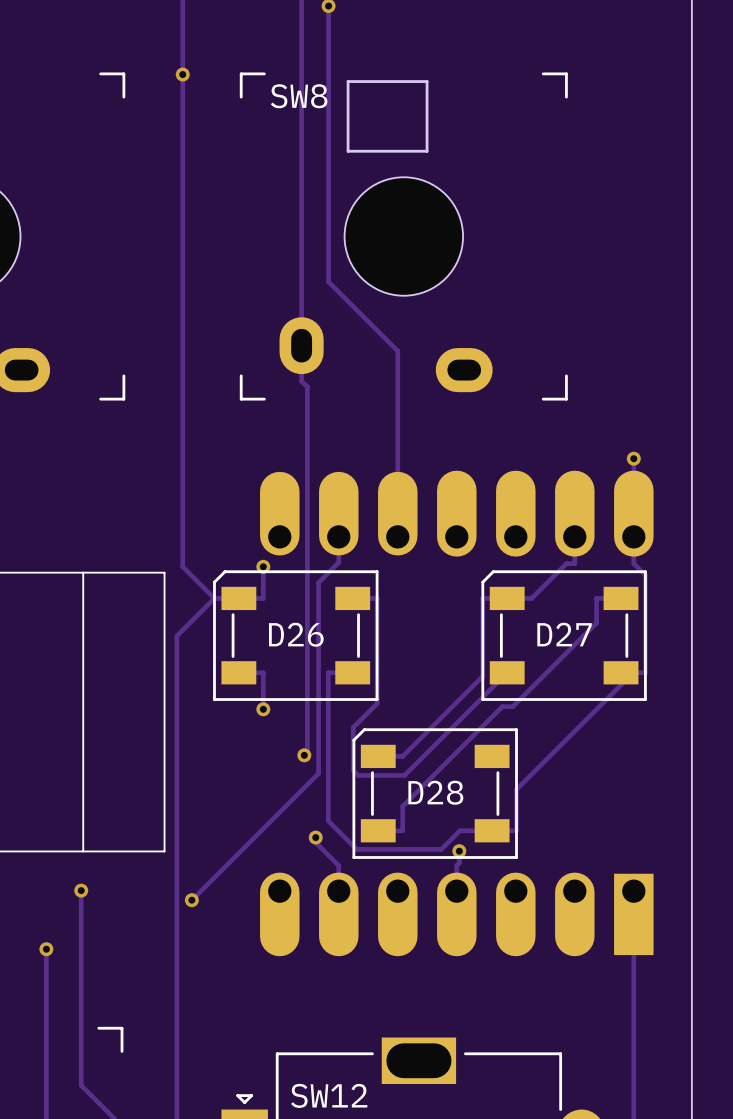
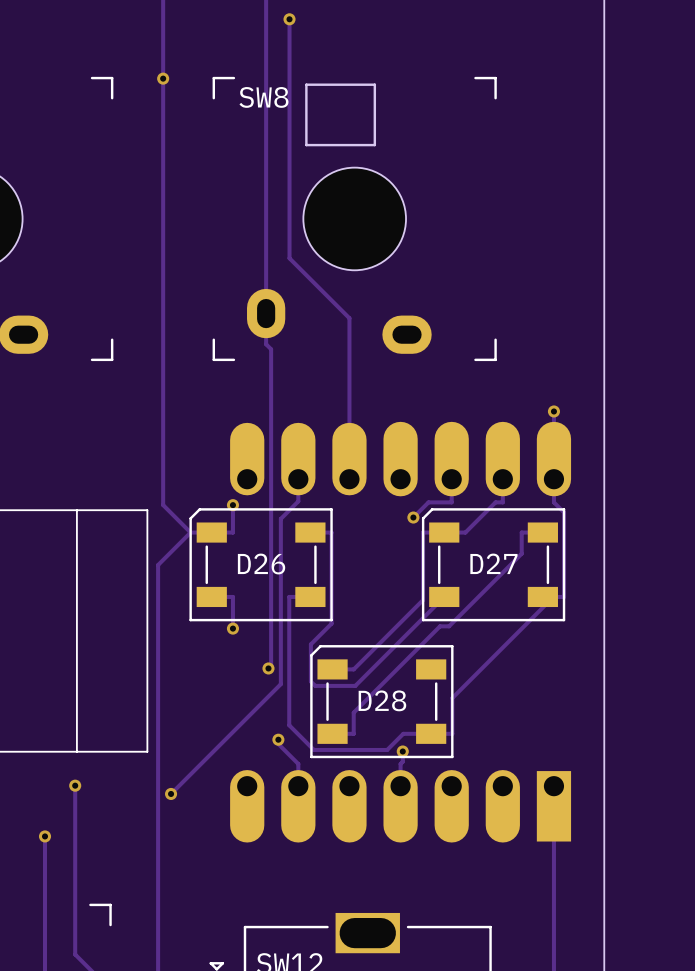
track: none -> (451, 479) (451, 502) (428, 502) (413, 517)
via: none -> (413, 517)

